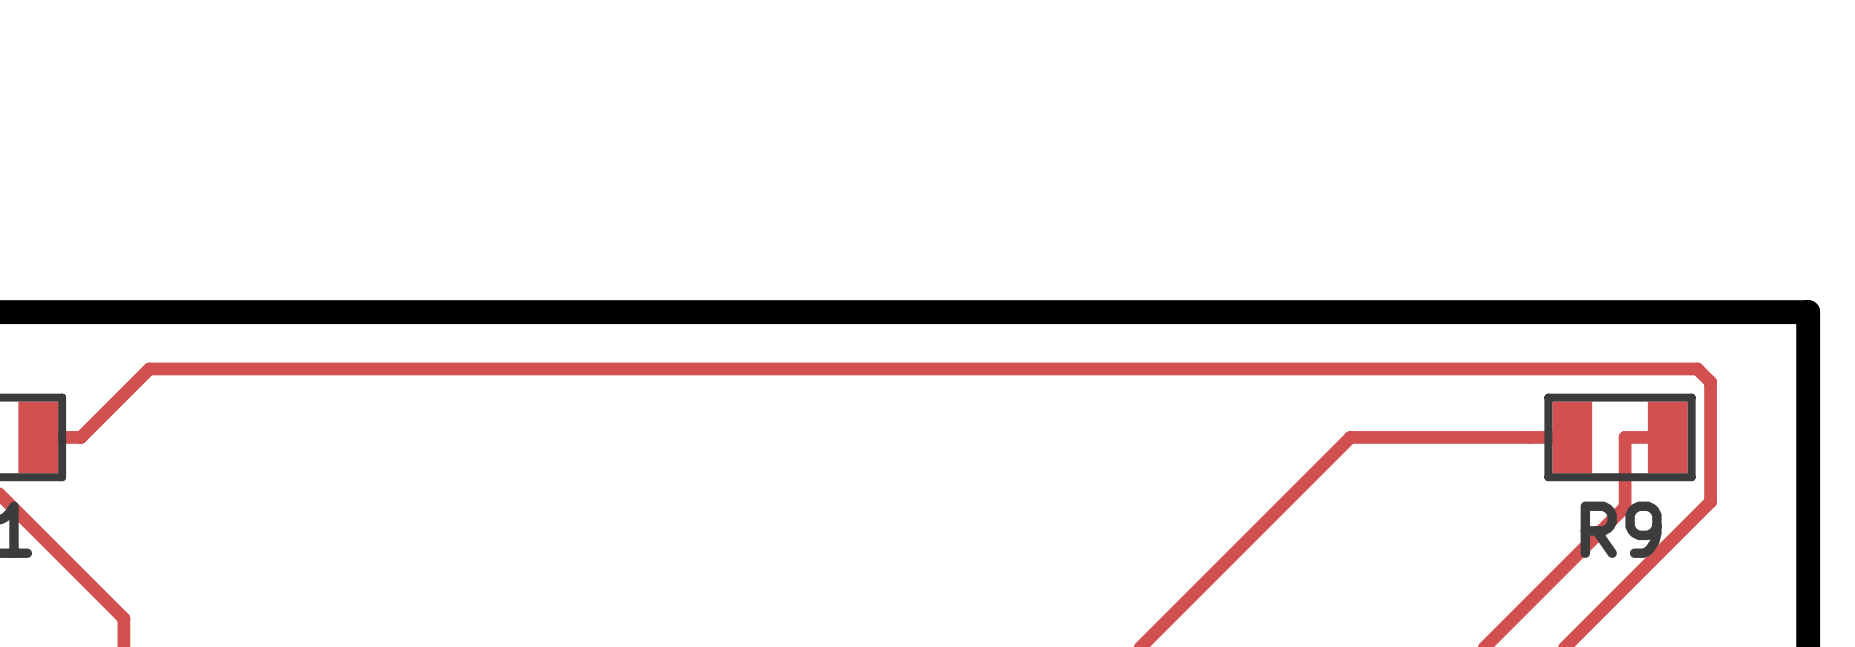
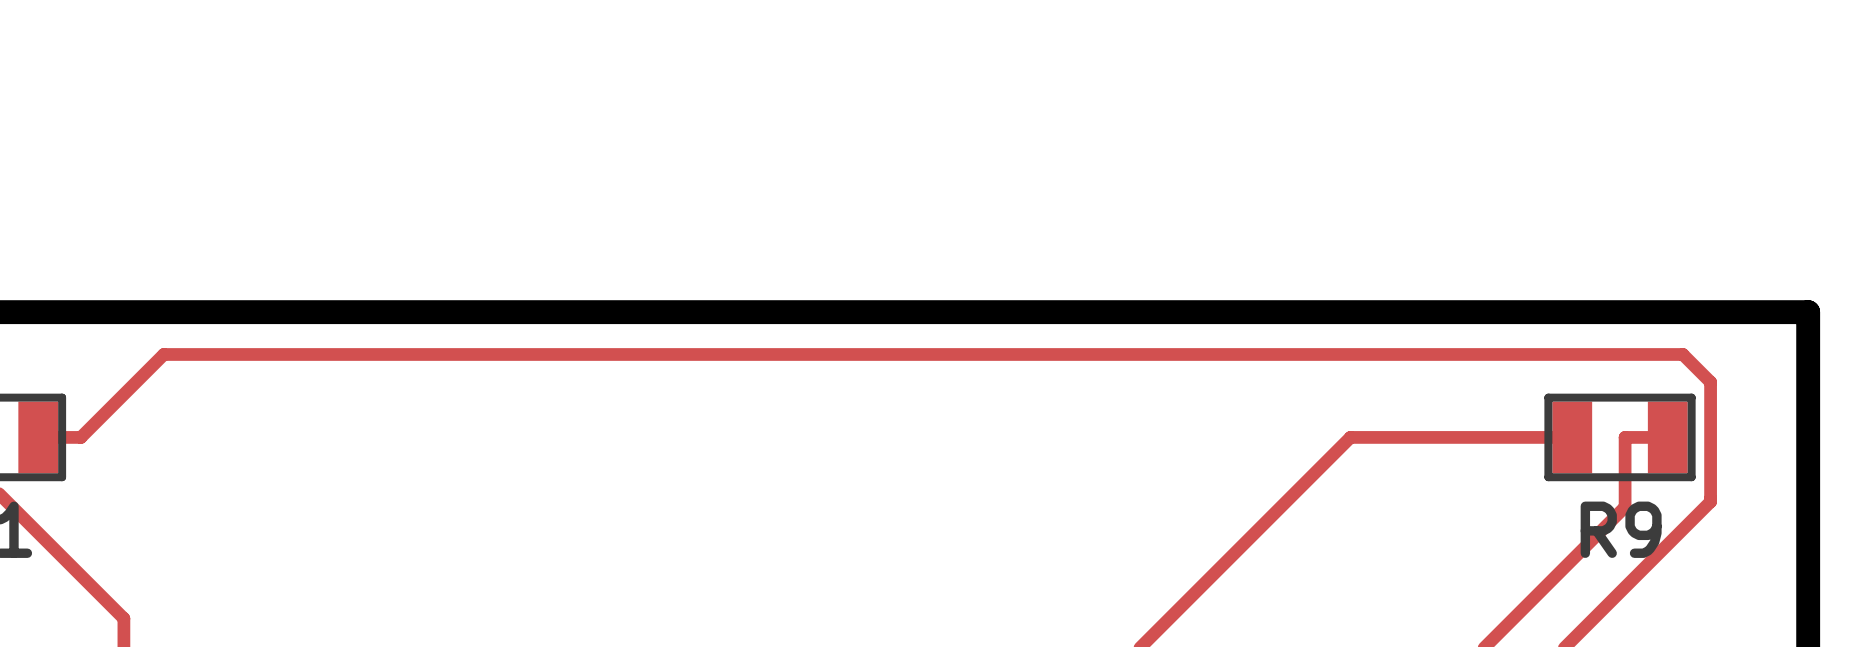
top track: (149, 368) (1697, 368) -> (149, 368) (163, 354) (1682, 354) (1697, 368)

